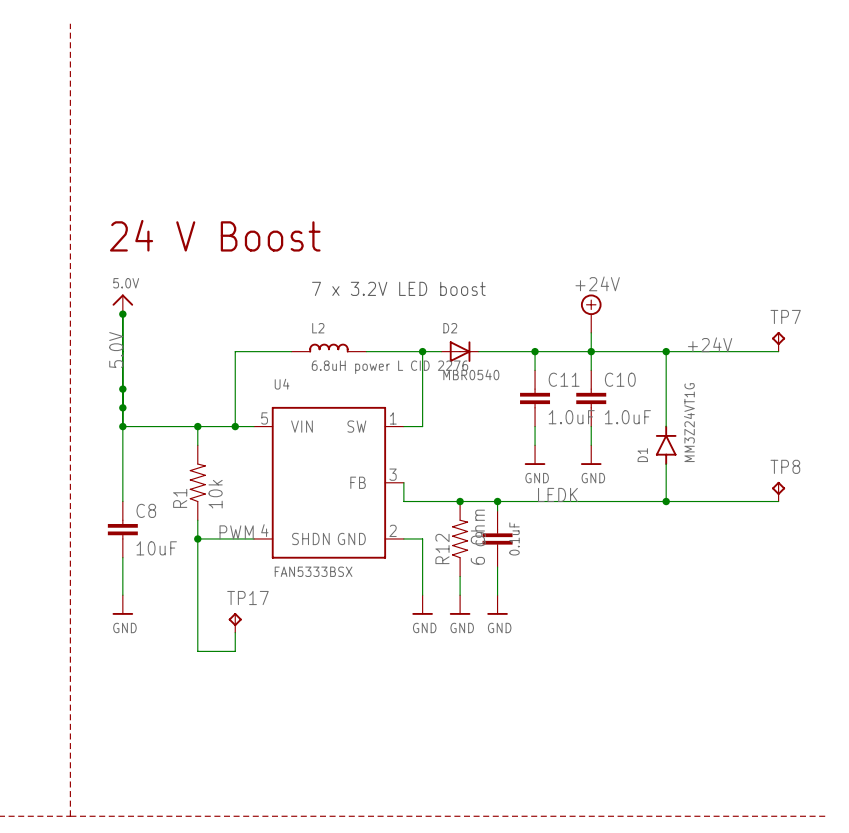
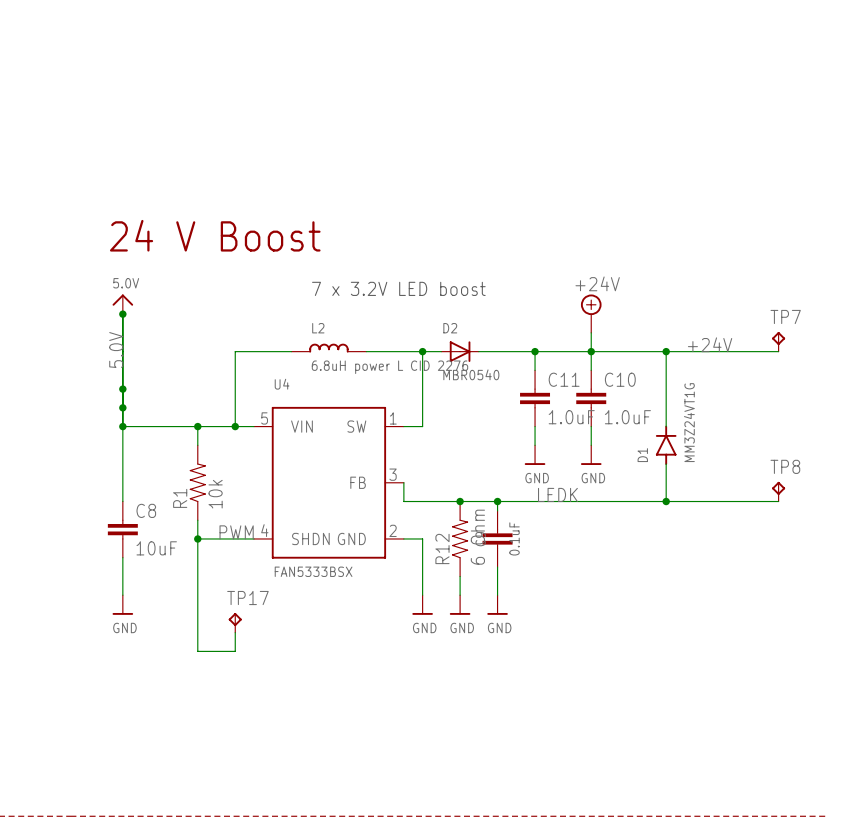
line: (70, 23) (70, 816) -> none

